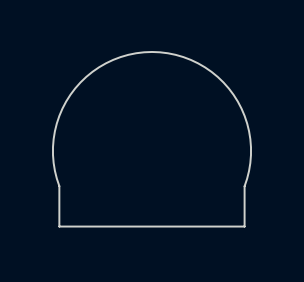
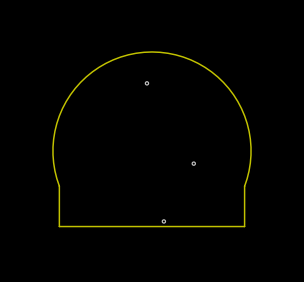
via: none -> (146, 83)
via: none -> (193, 163)
via: none -> (163, 221)

